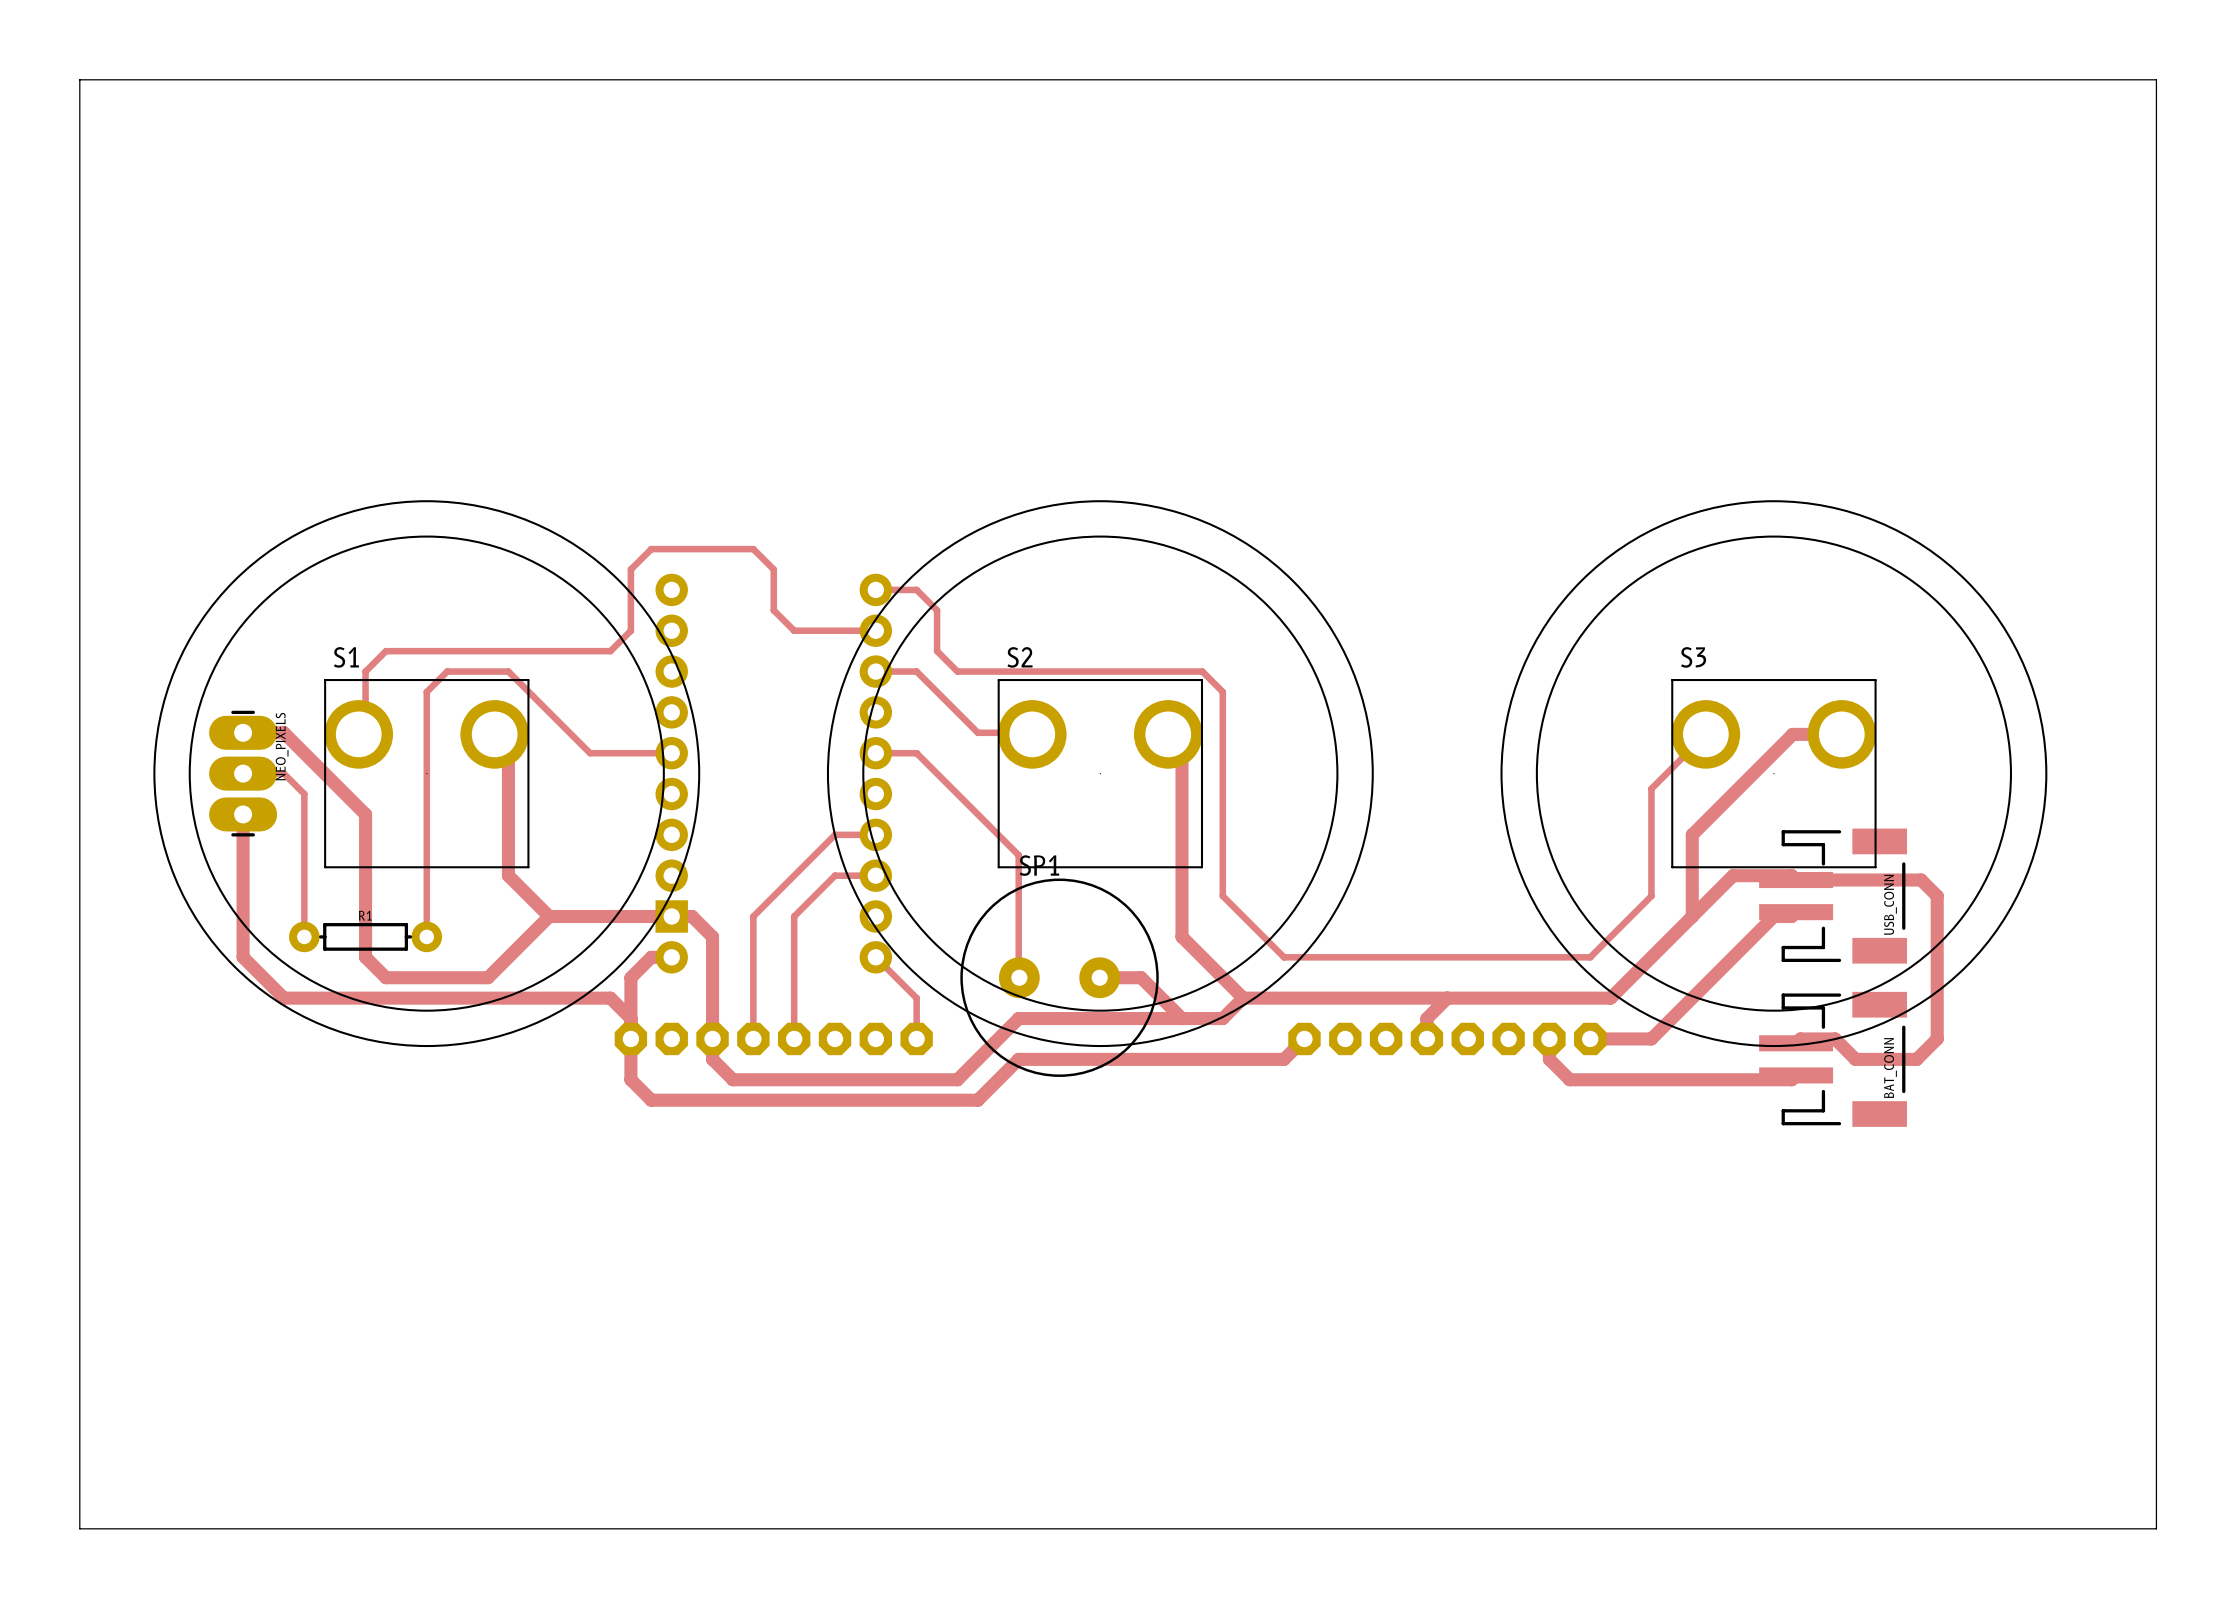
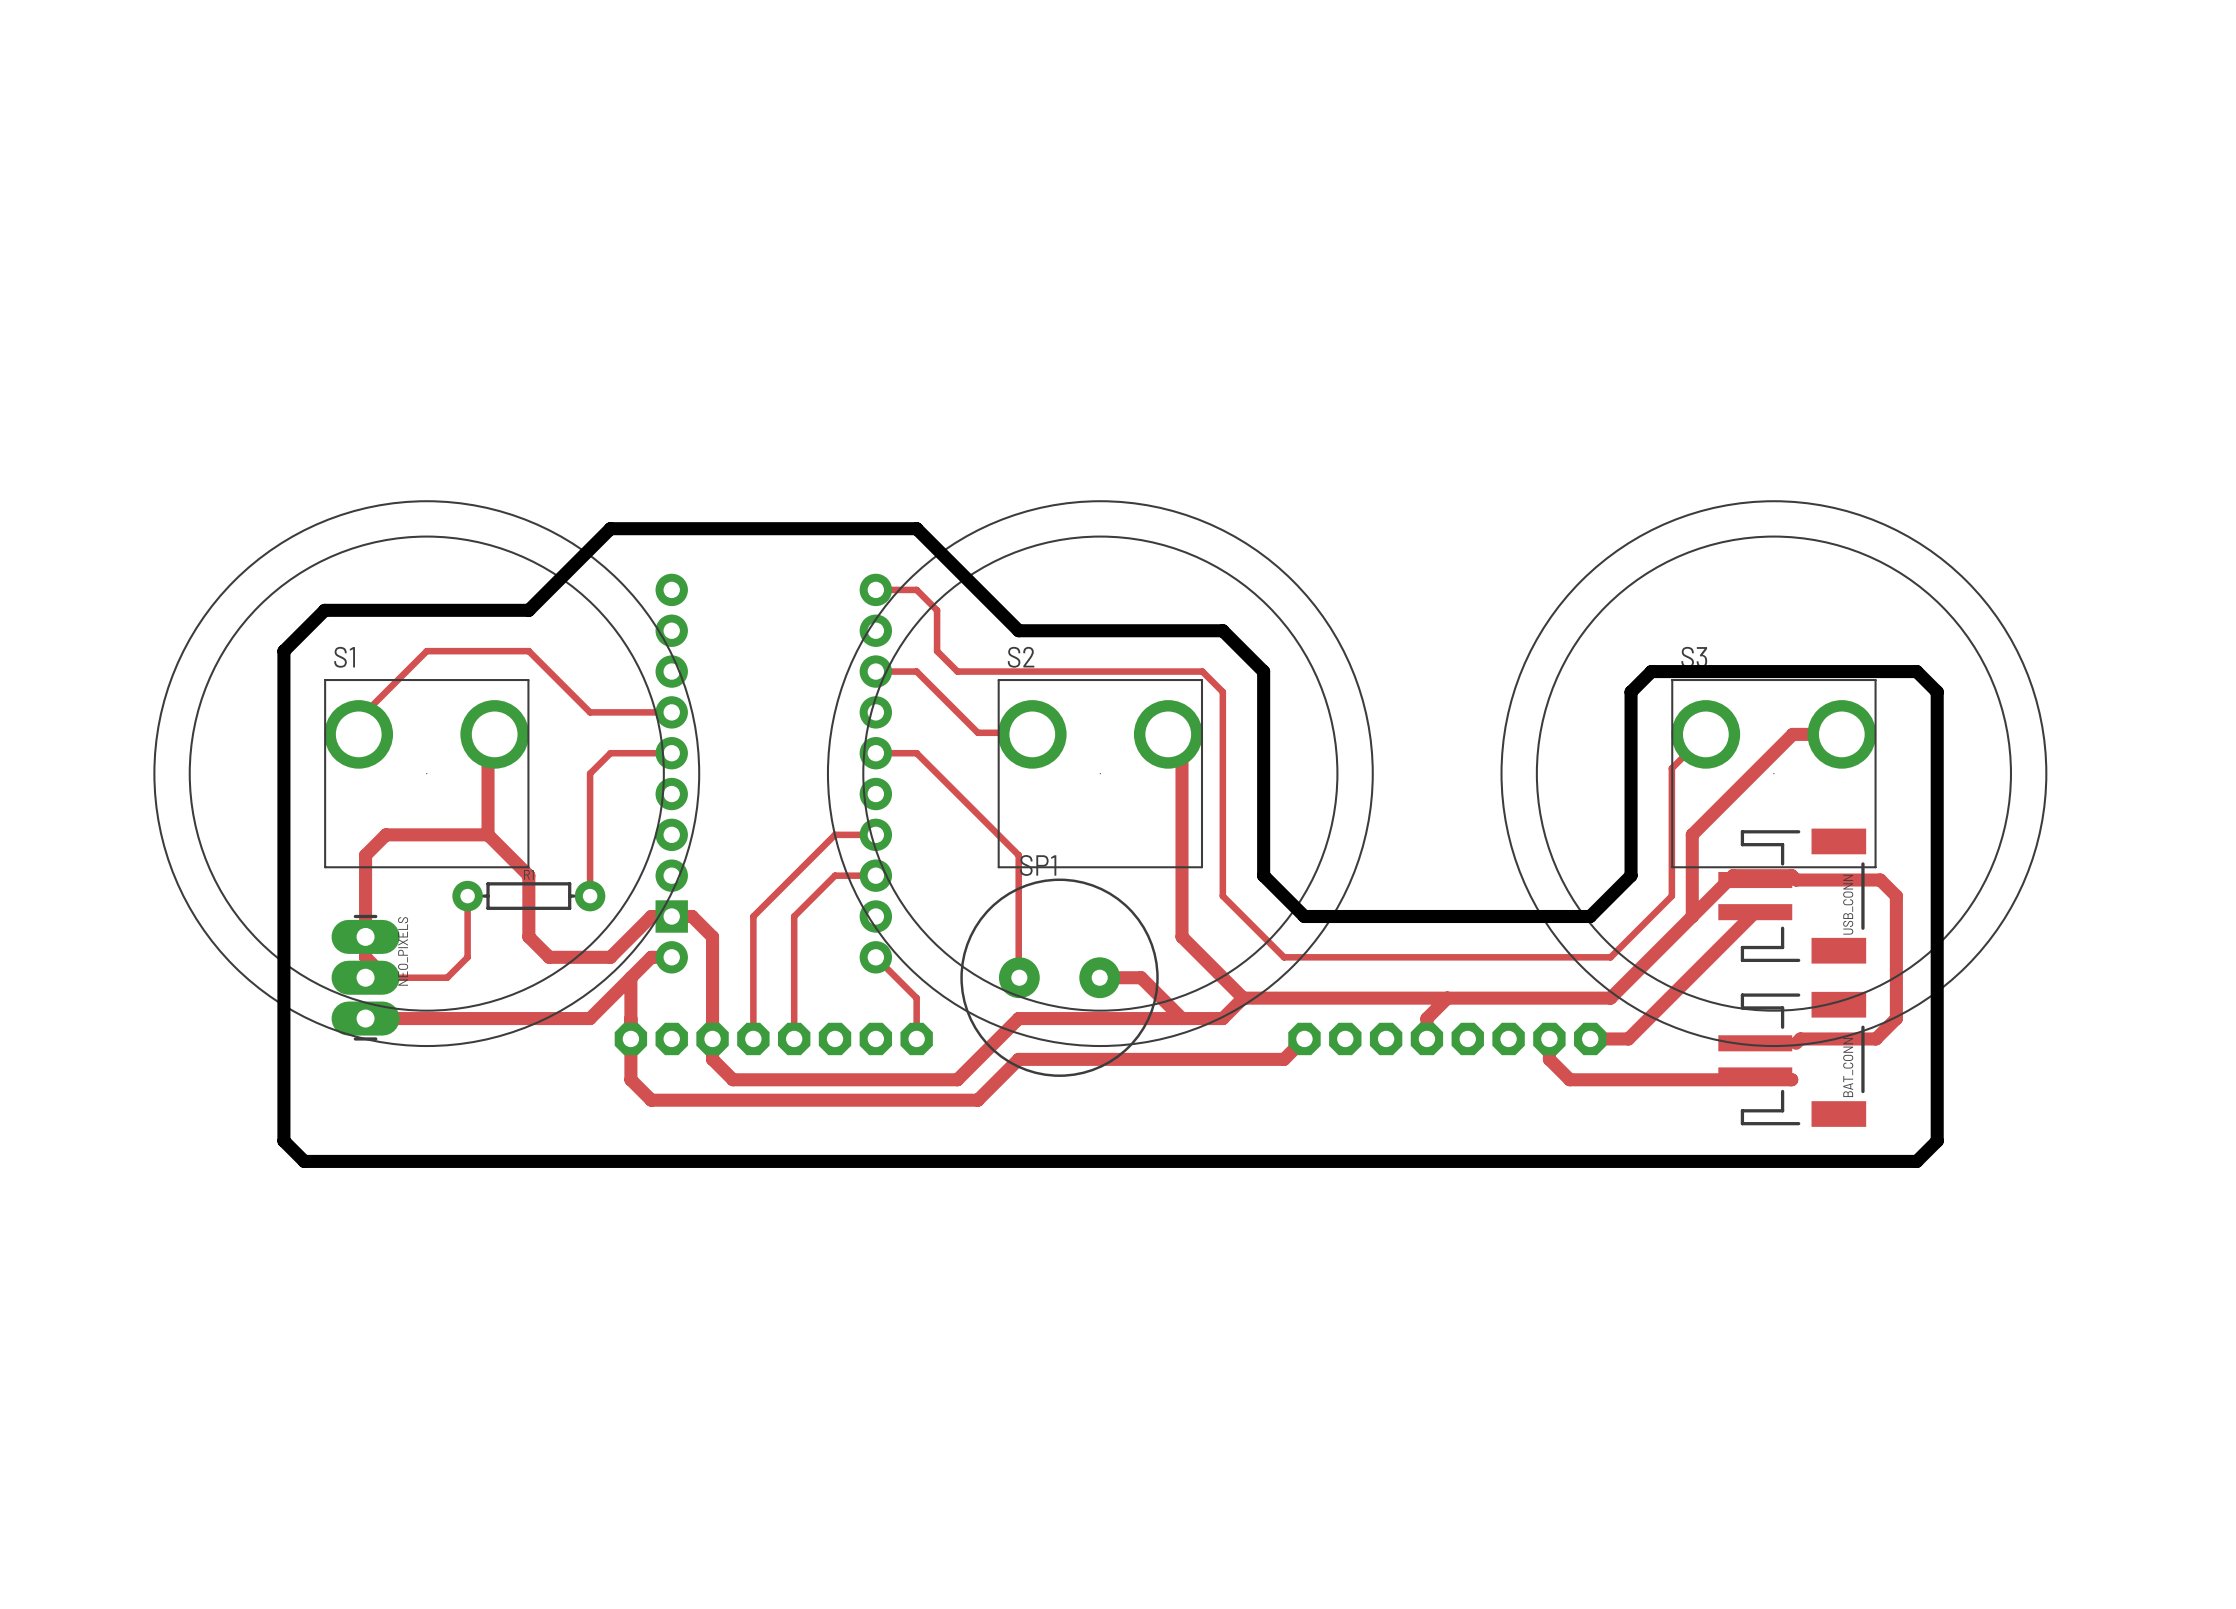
board edge: (79, 79) (2156, 79) (2156, 1528) (79, 1528) (79, 79) -> none
board edge: none -> (610, 528) (916, 528) (1018, 630) (1222, 630) (1263, 671) (1263, 875) (1304, 916) (1590, 916) (1631, 875) (1631, 691) (1651, 671) (1916, 671) (1937, 691) (1937, 1141) (1916, 1161) (304, 1161) (283, 1141) (283, 651) (324, 610) (528, 610) (610, 528)
top track: (875, 630) (794, 630) (773, 610) (773, 569) (753, 549) (651, 549) (630, 569) (630, 630) (610, 651) (528, 651) -> (671, 712) (590, 712) (528, 651)
top track: (426, 651) (385, 651) (365, 671) (365, 712) -> (426, 651) (365, 712)
top track: (243, 732) (283, 732) (365, 814) (365, 855) -> (488, 834) (385, 834) (365, 855)
top track: (494, 734) (508, 748) (508, 875) (549, 916) -> (494, 734) (488, 741) (488, 834)
top track: (610, 753) (590, 753) (508, 671) (447, 671) (426, 691) (426, 936) -> (610, 753) (590, 773) (590, 896)
top track: (1671, 768) (1651, 788) (1651, 896) (1590, 957) -> (1671, 768) (1671, 896) (1610, 957) (1590, 957)
top track: (243, 773) (283, 773) (304, 794) (304, 936) -> none
NEO_PIXELS position: (243, 773) -> (365, 977)
top track: (243, 814) (243, 957) (283, 998) (610, 998) (630, 1018) -> none
top track: (1880, 880) (1921, 880) (1937, 896) (1937, 1038) (1916, 1059) (1855, 1059) (1835, 1038) -> (1880, 880) (1896, 896) (1896, 1018) (1875, 1038) (1835, 1038)
USB_CONN position: (1833, 896) -> (1792, 896)
top track: (1796, 912) (1791, 916) (1773, 916) (1651, 1038) (1628, 1038) -> (1755, 912) (1628, 1038)
top track: (549, 916) (488, 977) (447, 977) -> (467, 896) (467, 957) (447, 977)
top track: (549, 916) (651, 916) -> (488, 834) (528, 875) (528, 936) (549, 957) (610, 957) (651, 916)
R1 position: (365, 936) -> (528, 896)
top track width: thick (385, 977) (447, 977) -> thin (385, 977) (447, 977)
top track: none -> (630, 977) (590, 1018) (365, 1018)
BAT_CONN position: (1833, 1059) -> (1792, 1059)

